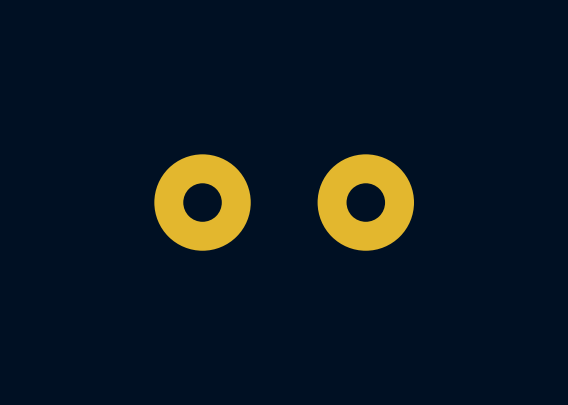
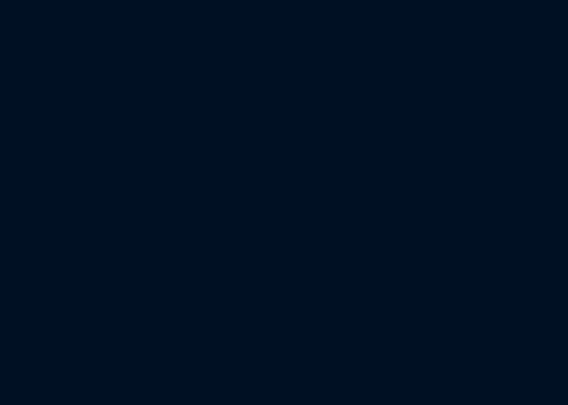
part: (284, 202) -> none

